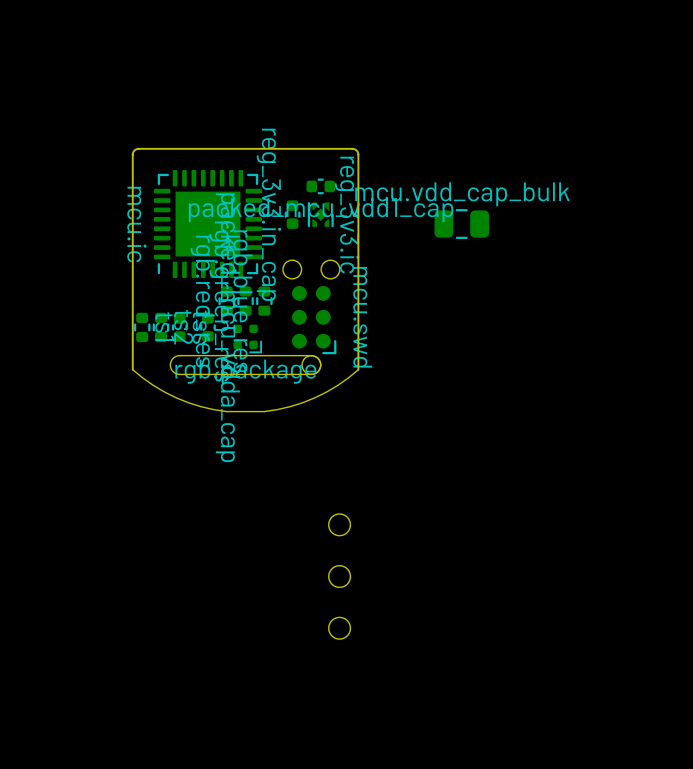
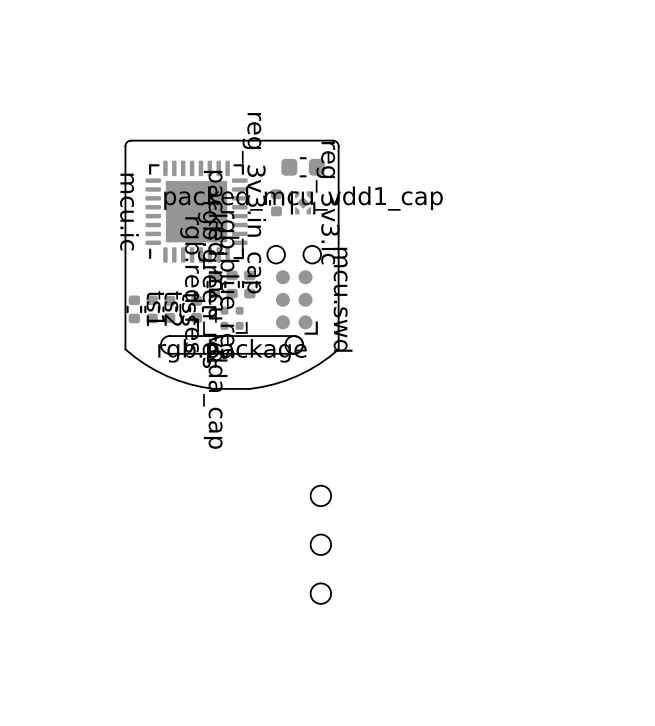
packed_mcu_vdd1_cap footprint: [306, 178, 336, 195] -> [281, 157, 325, 178]
mcu.vdd_cap_bulk: (461, 224) -> none

